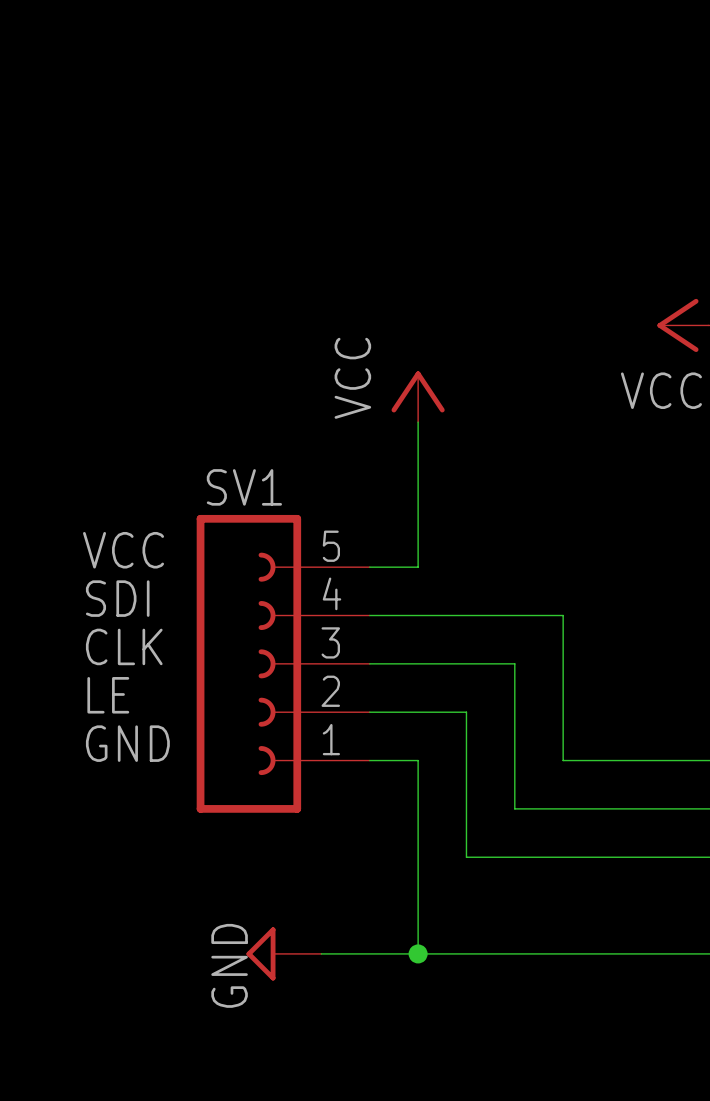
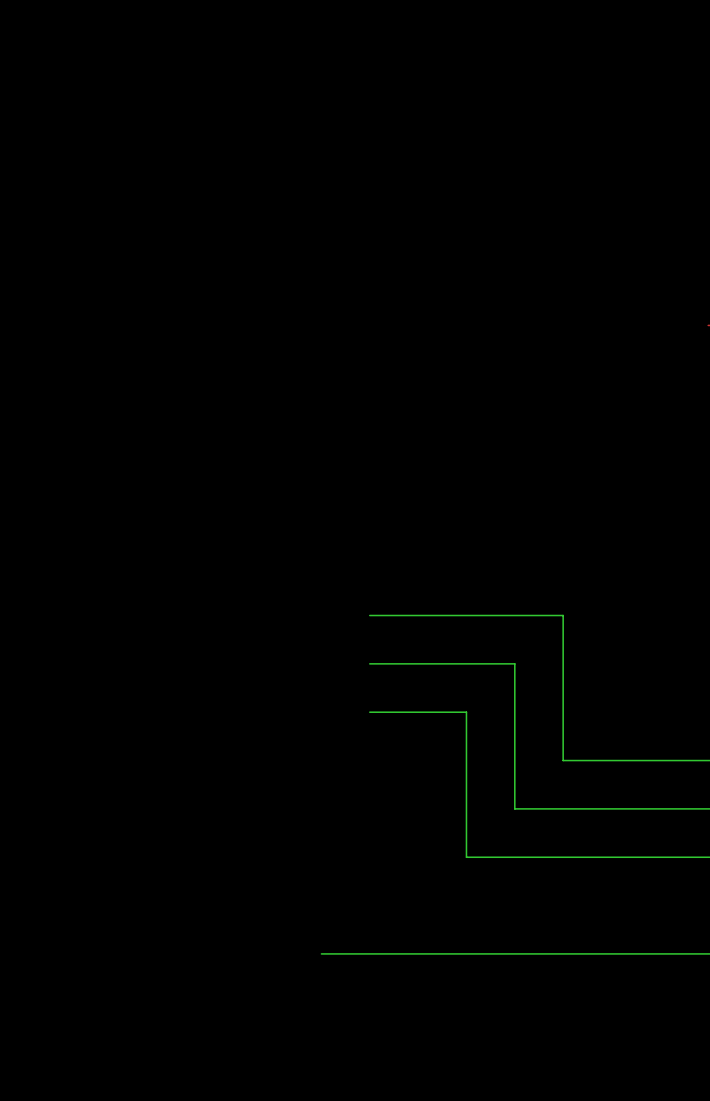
power symbol: VCC (682, 325) -> none
power symbol: VCC (418, 396) -> none
wire: (418, 422) (418, 567) (369, 567) -> none
label: VCC (123, 550) -> none
label: SDI (117, 598) -> none
label: CLK (124, 646) -> none
SV1: (283, 663) -> none
label: LE (108, 695) -> none
label: GND (127, 743) -> none
wire: (369, 760) (418, 760) (418, 953) -> none
power symbol: GND (283, 953) -> none
junction: (418, 953) -> none

